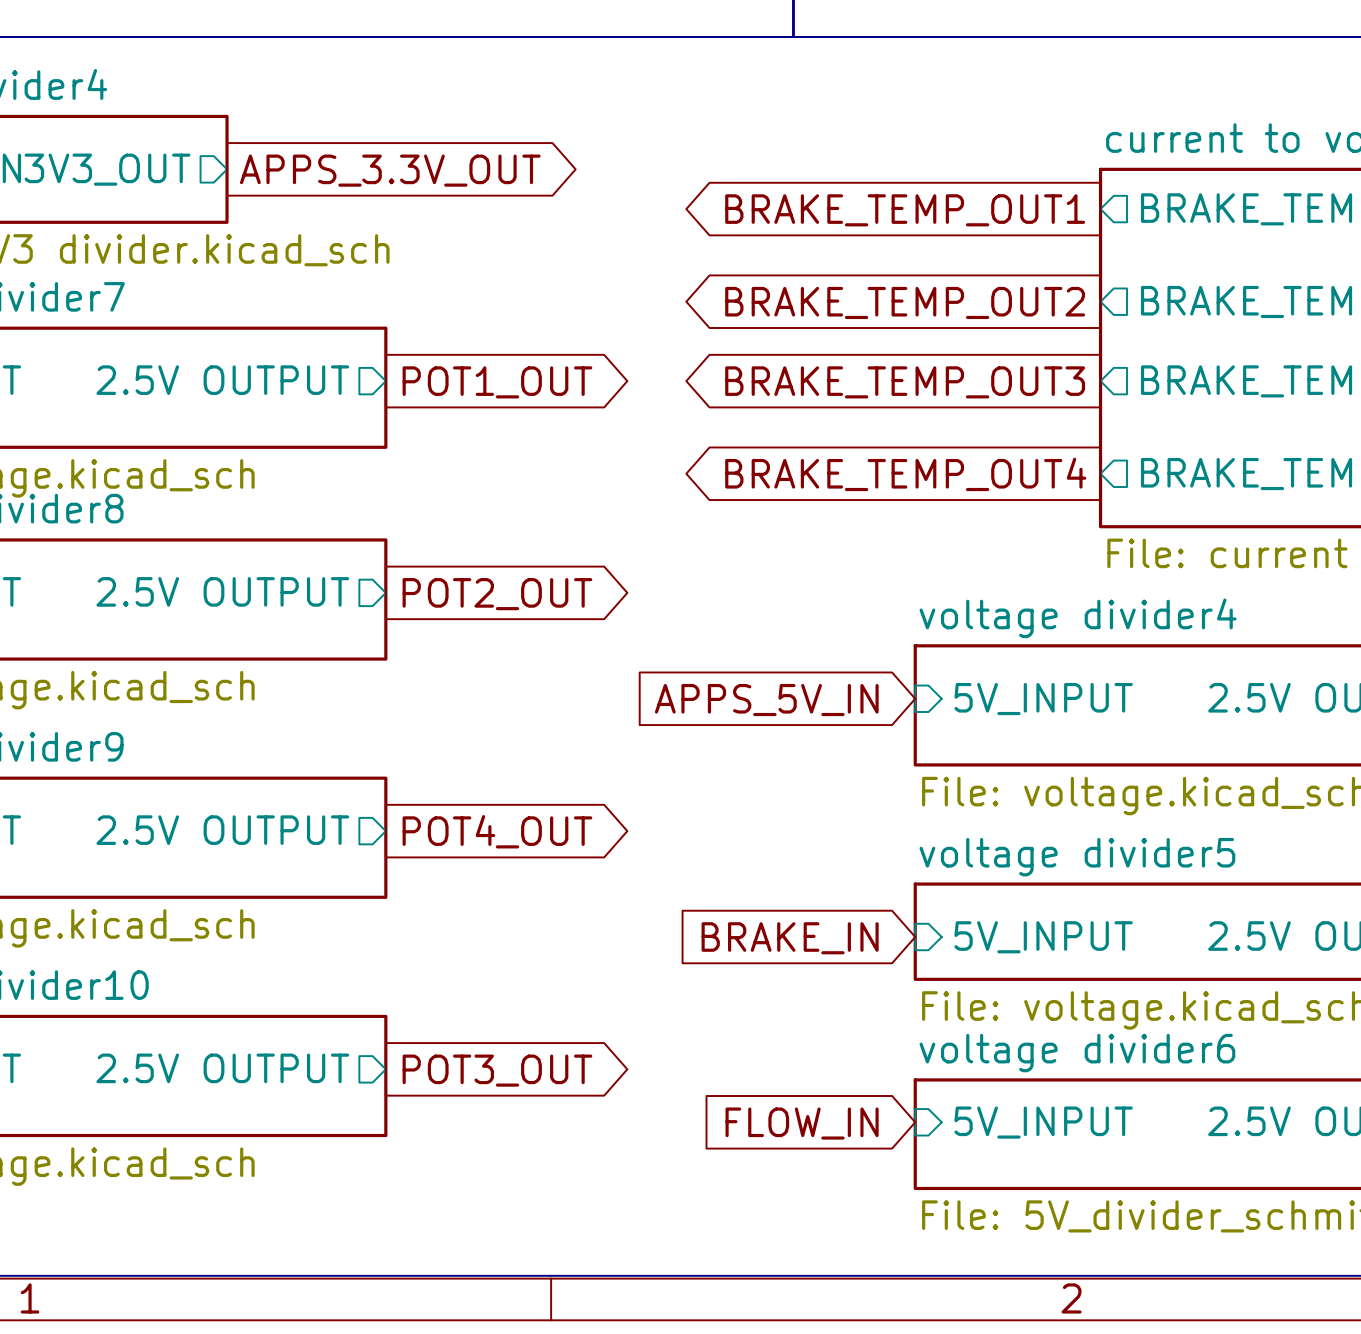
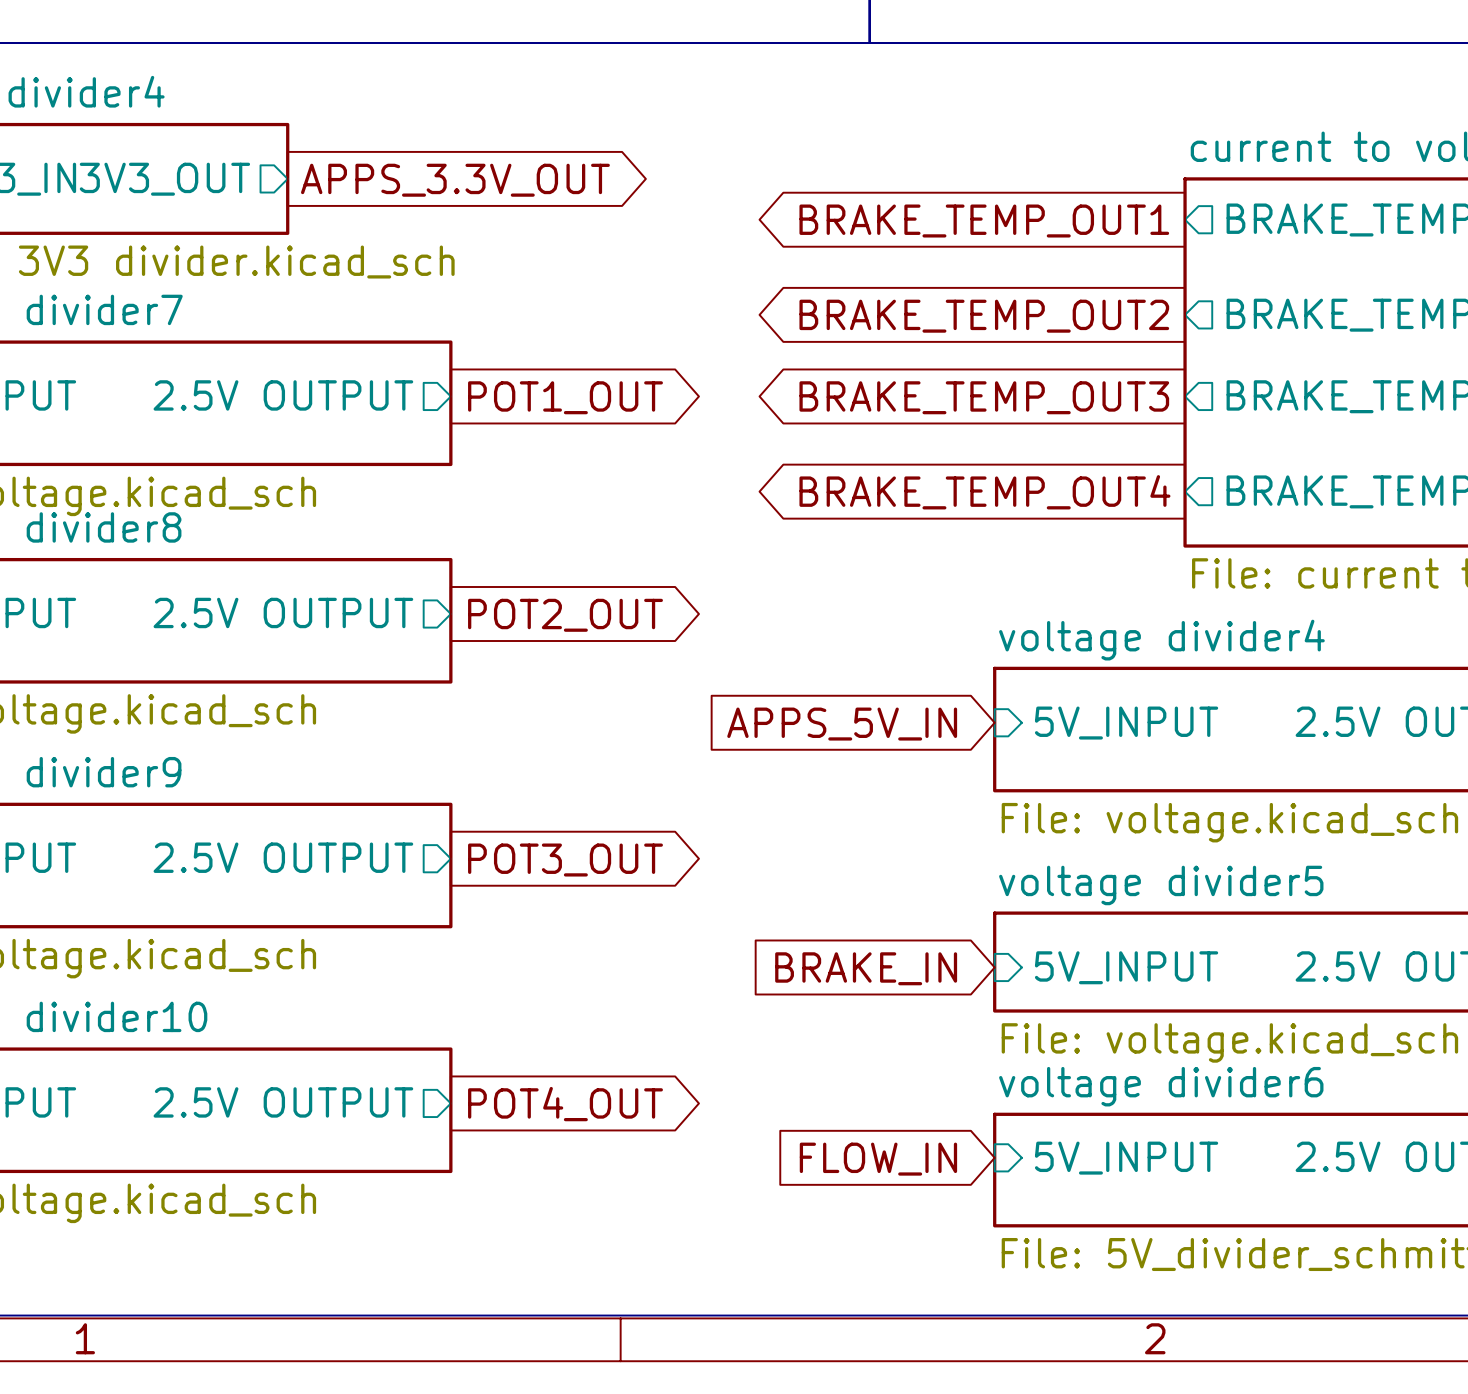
global label: POT4_OUT (497, 831) -> POT3_OUT (565, 860)
global label: POT3_OUT (497, 1070) -> POT4_OUT (565, 1104)

